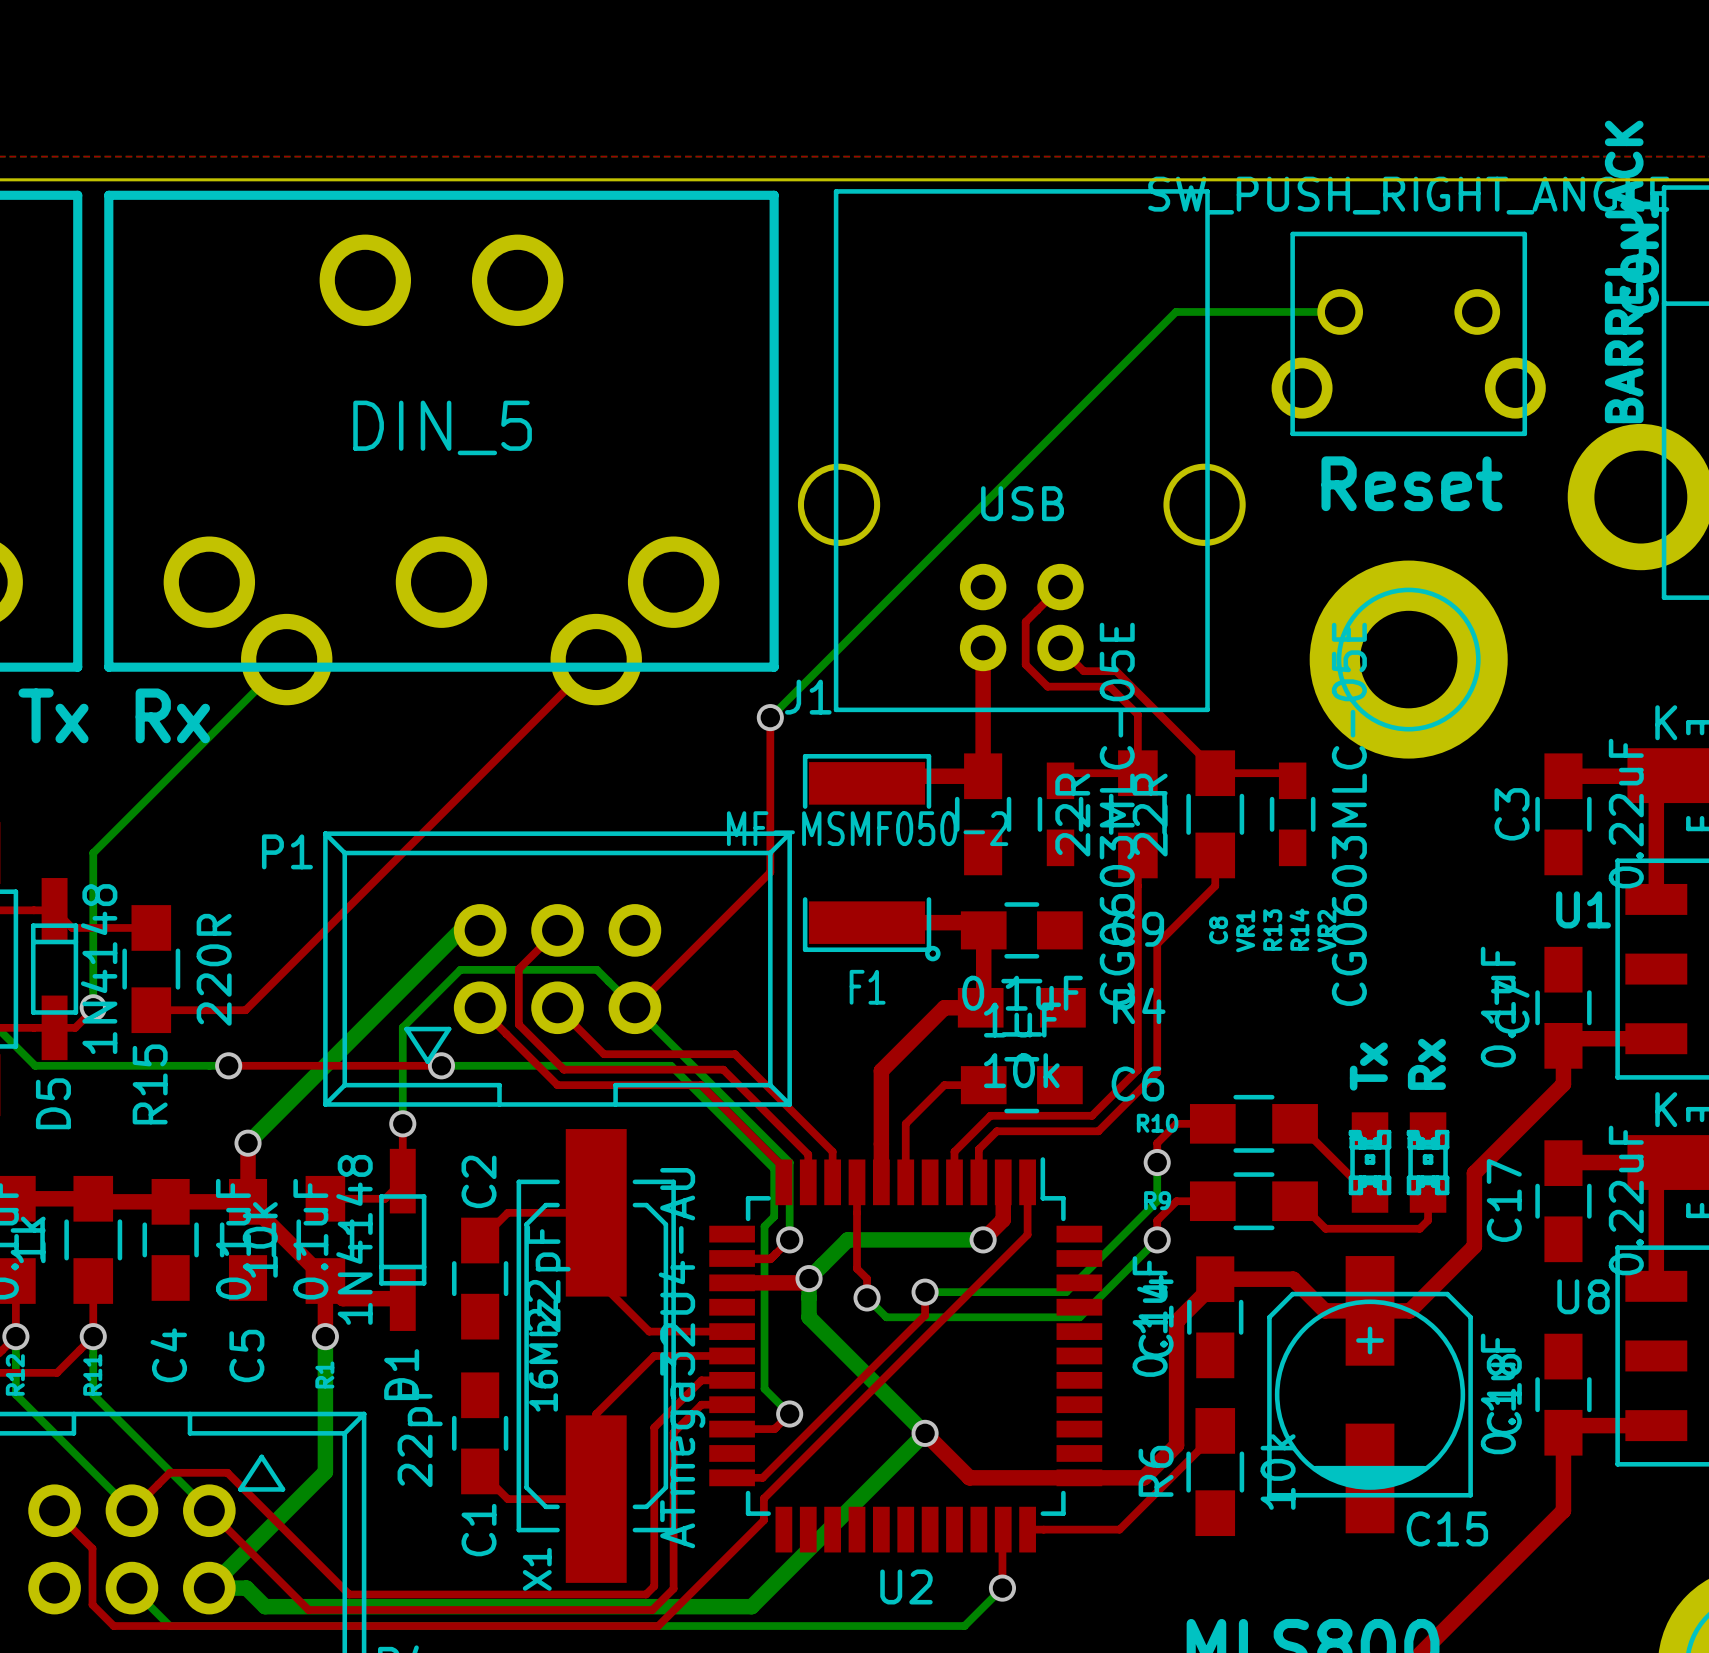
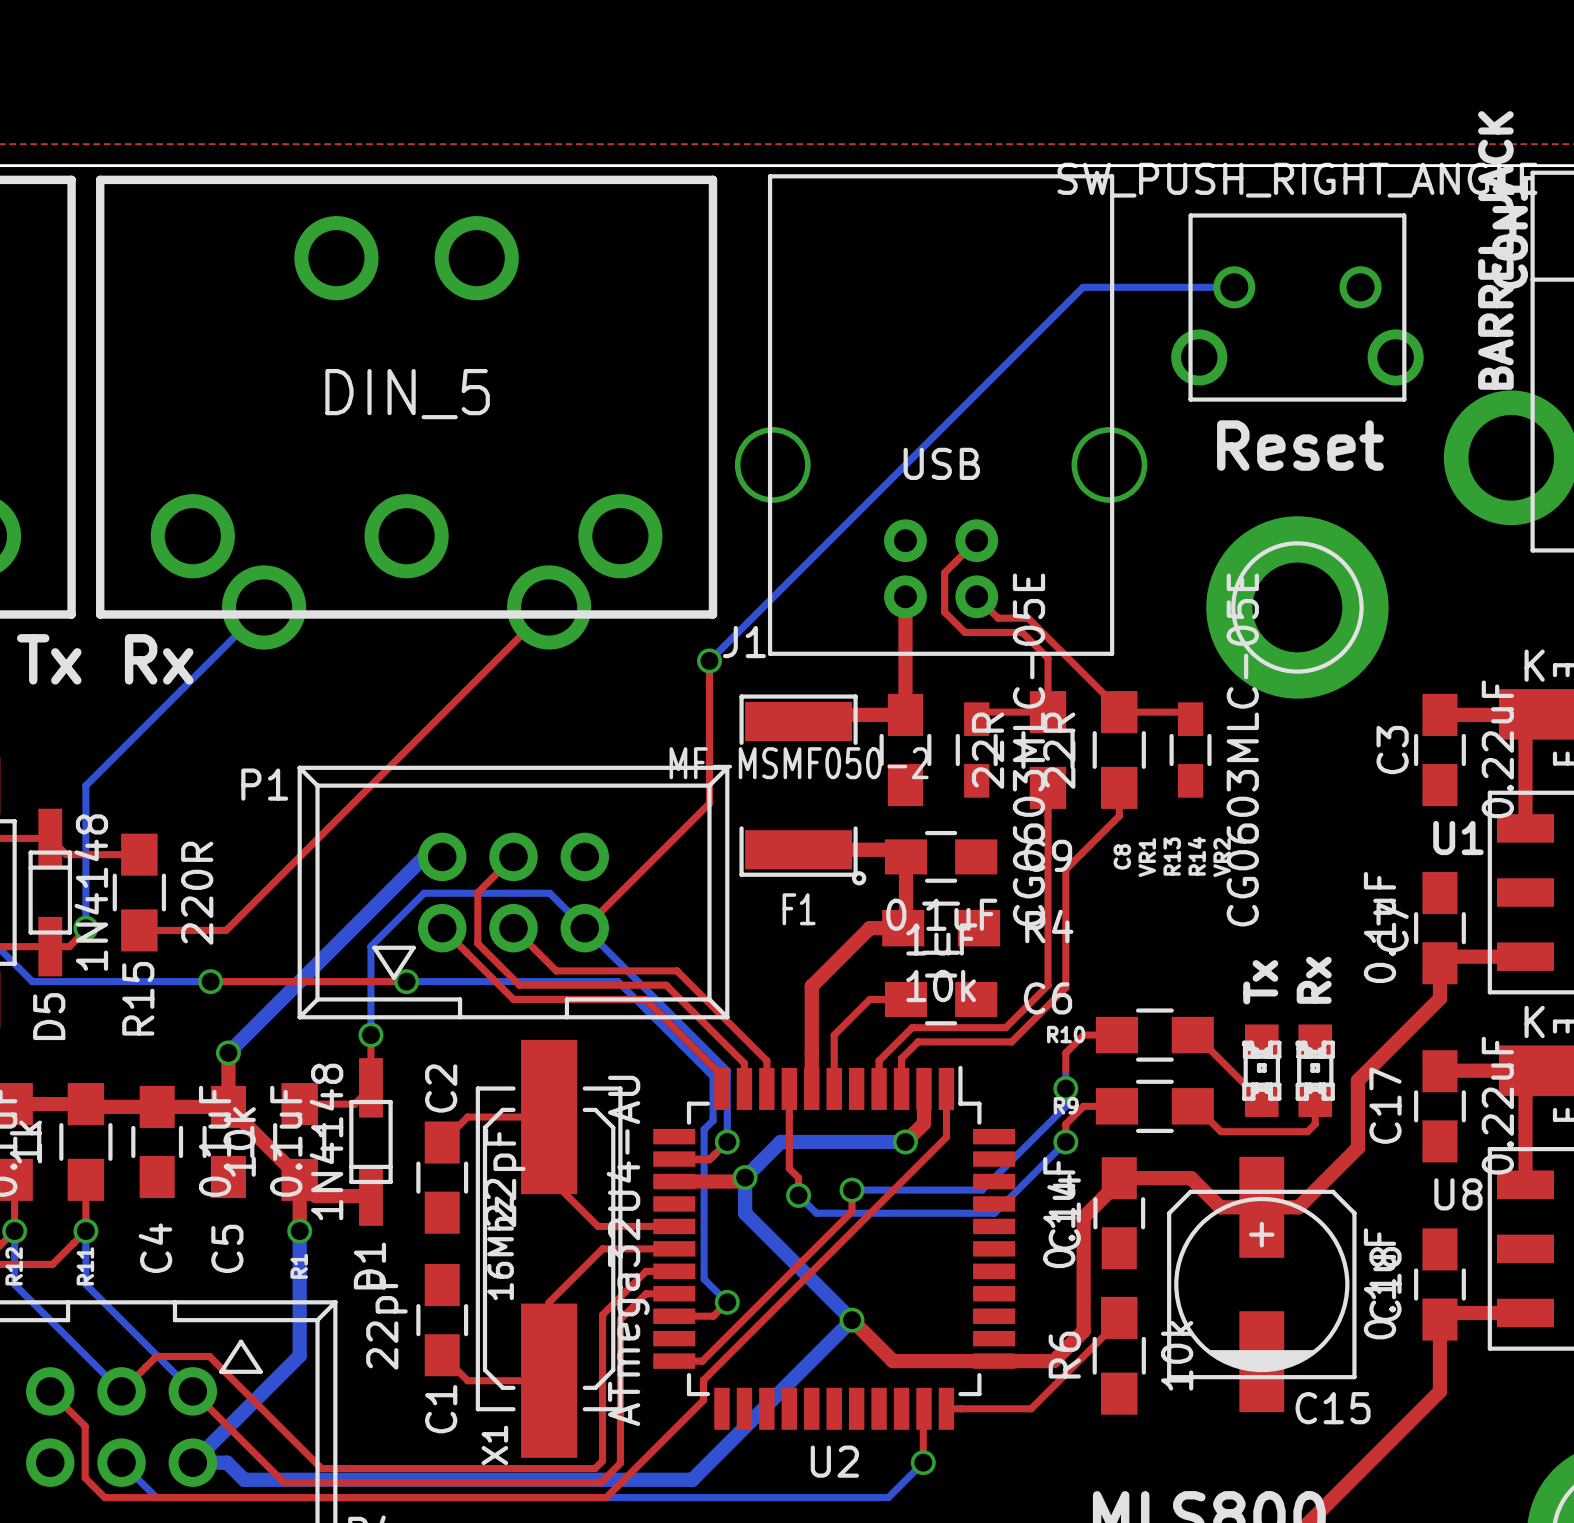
via position: (1157, 1162) -> (1065, 1088)

